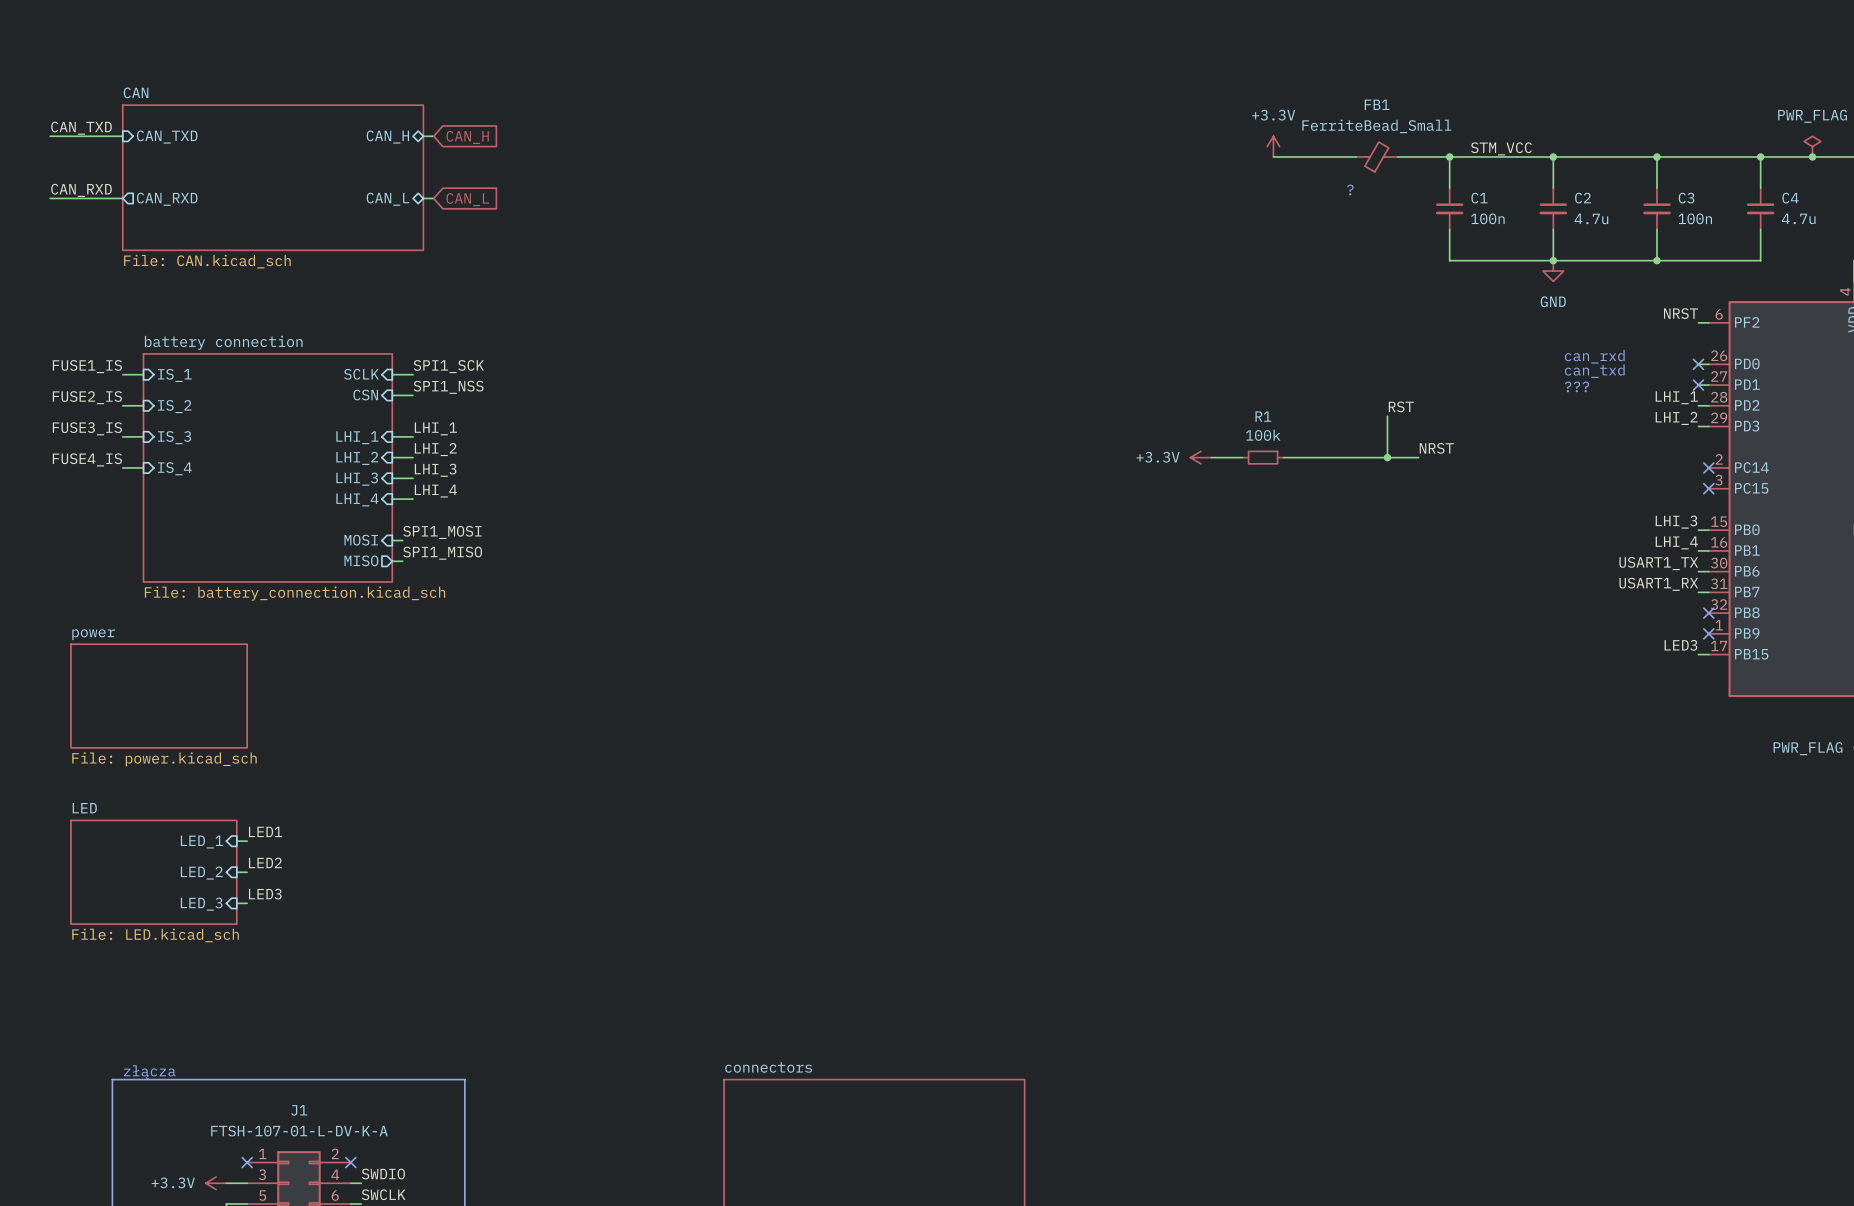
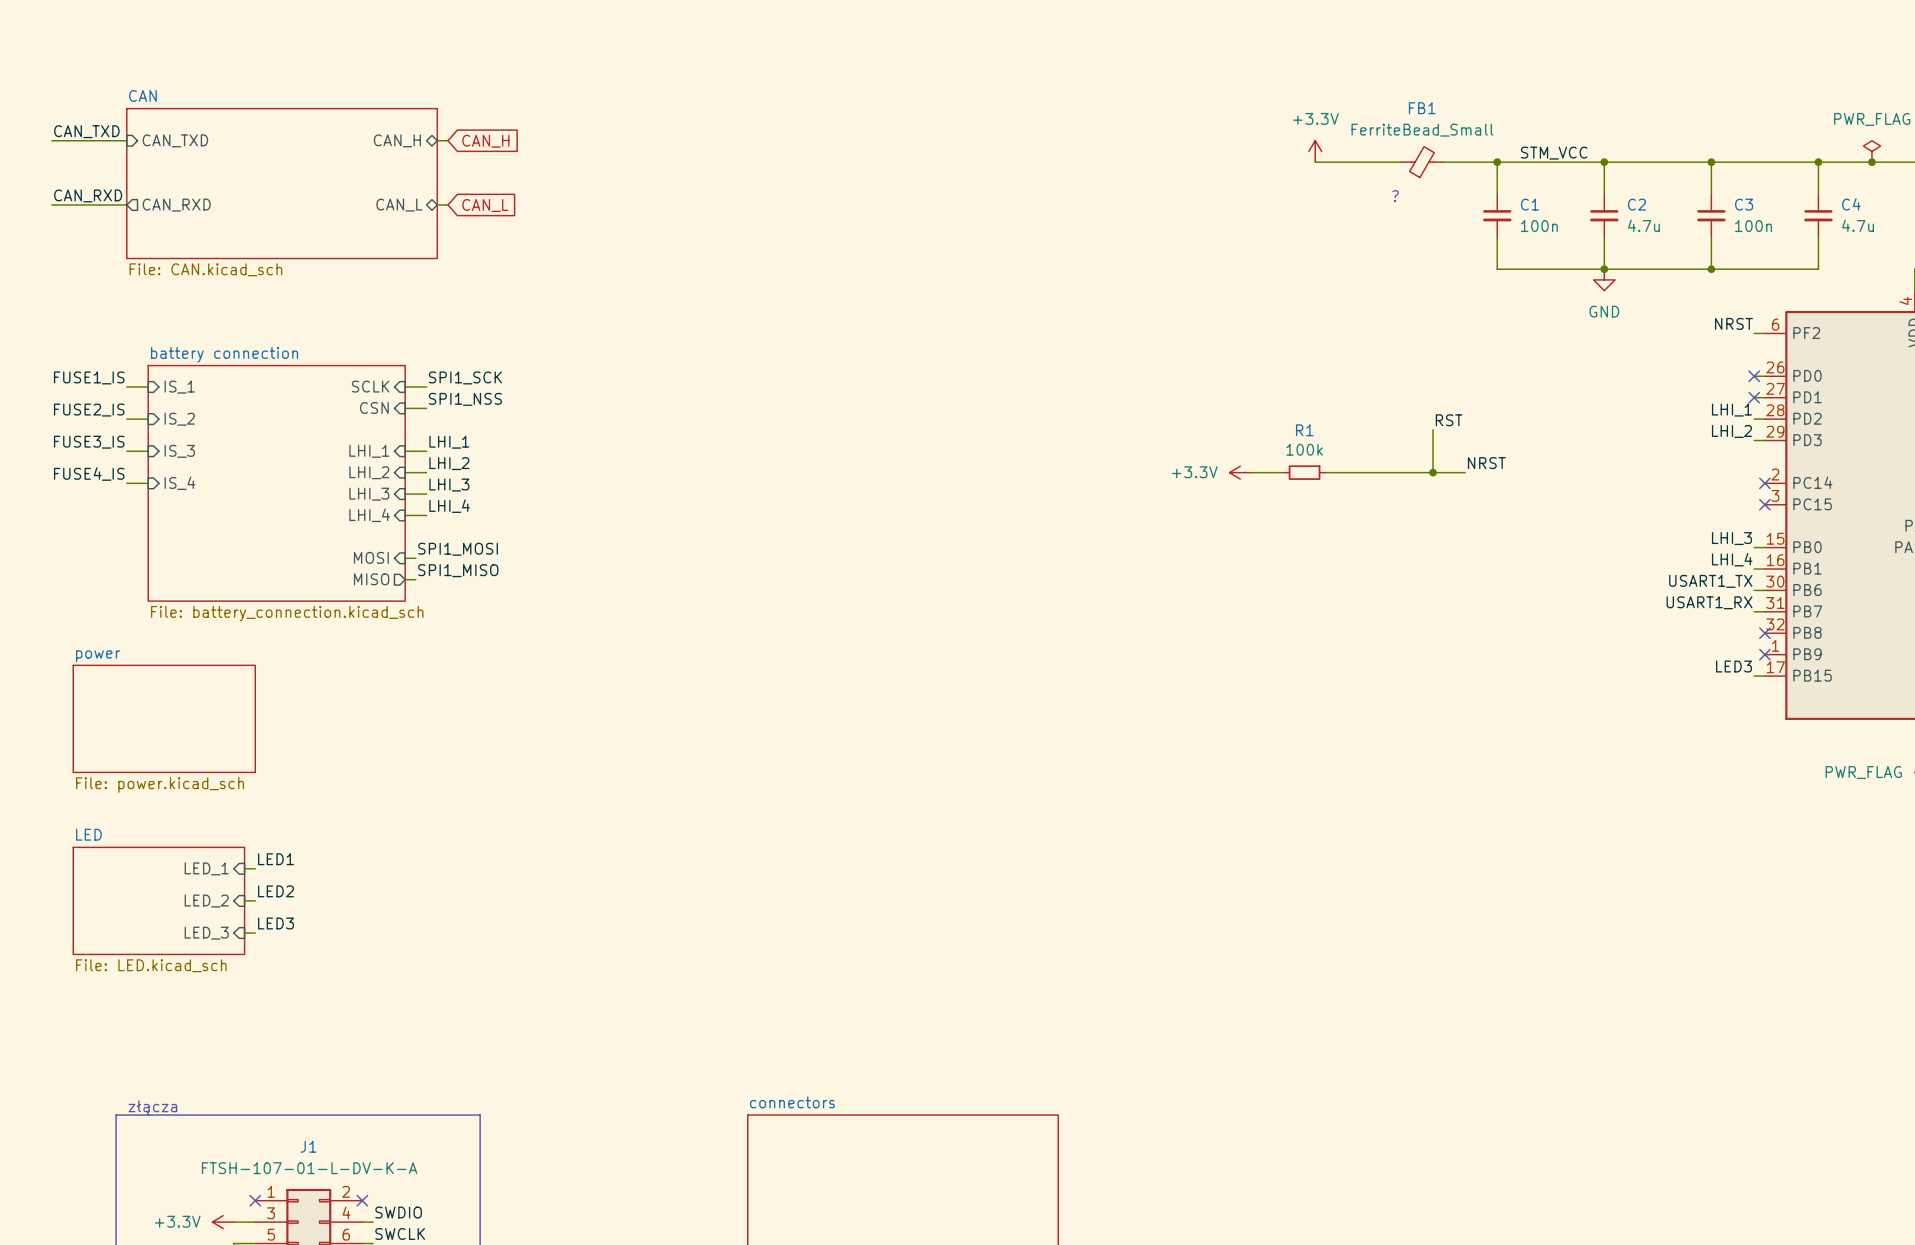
text: can_rxd (1594, 356) -> none
text: can_txd (1594, 371) -> none
text: ??? (1576, 386) -> none

